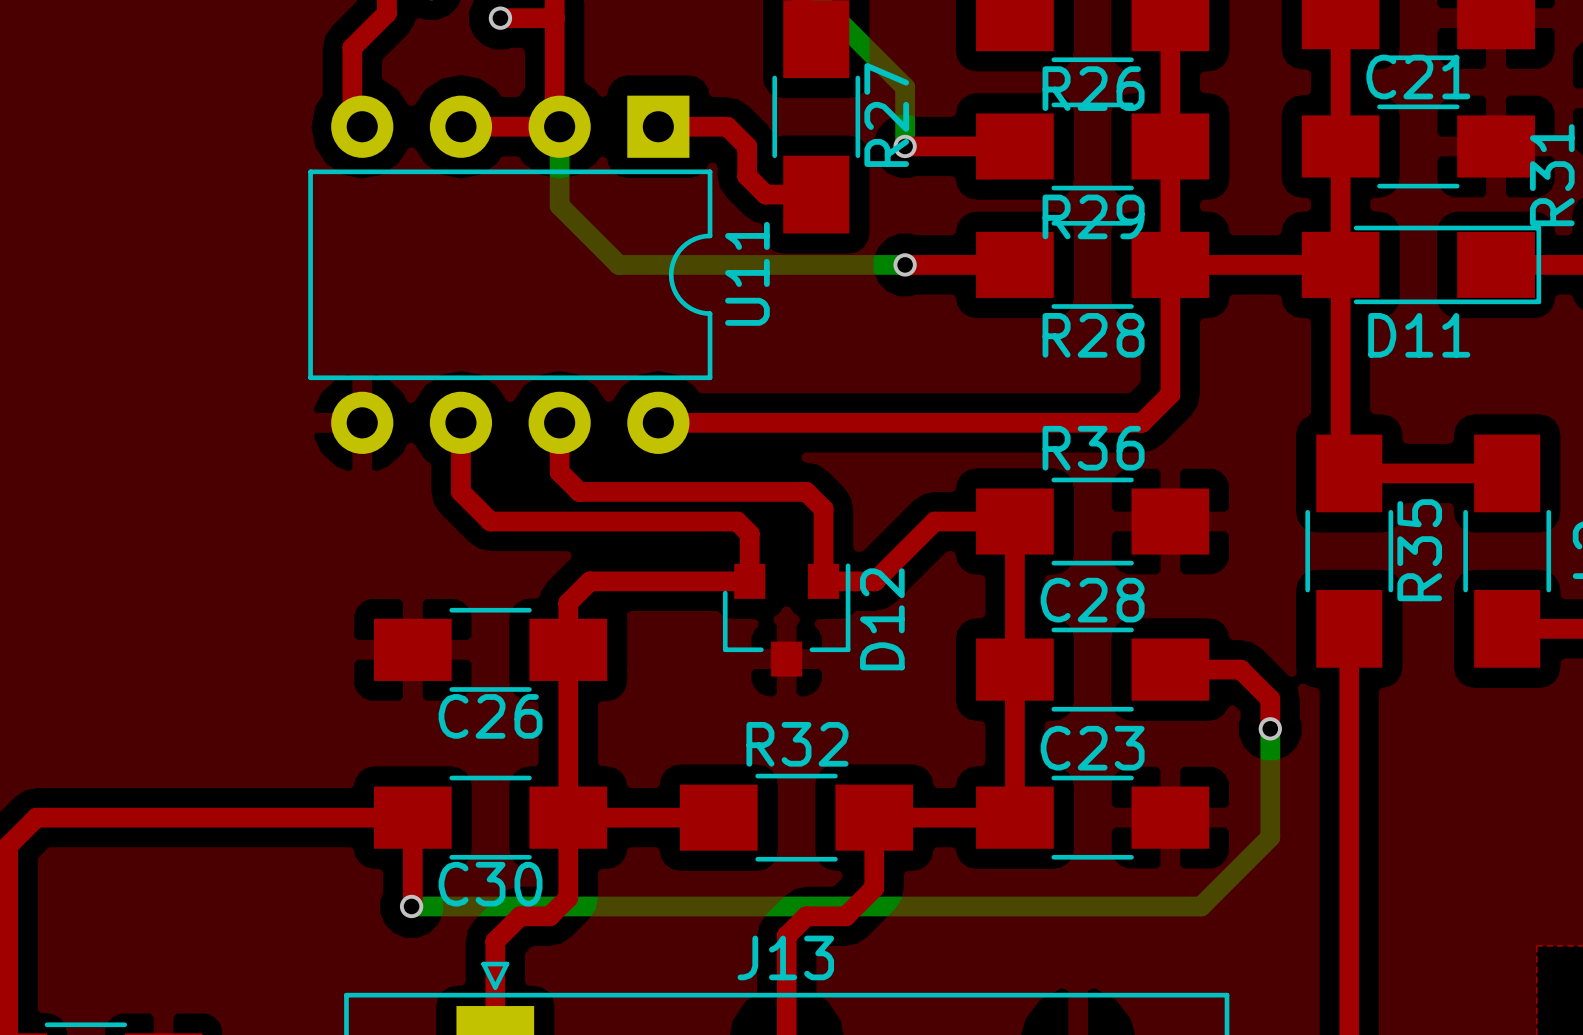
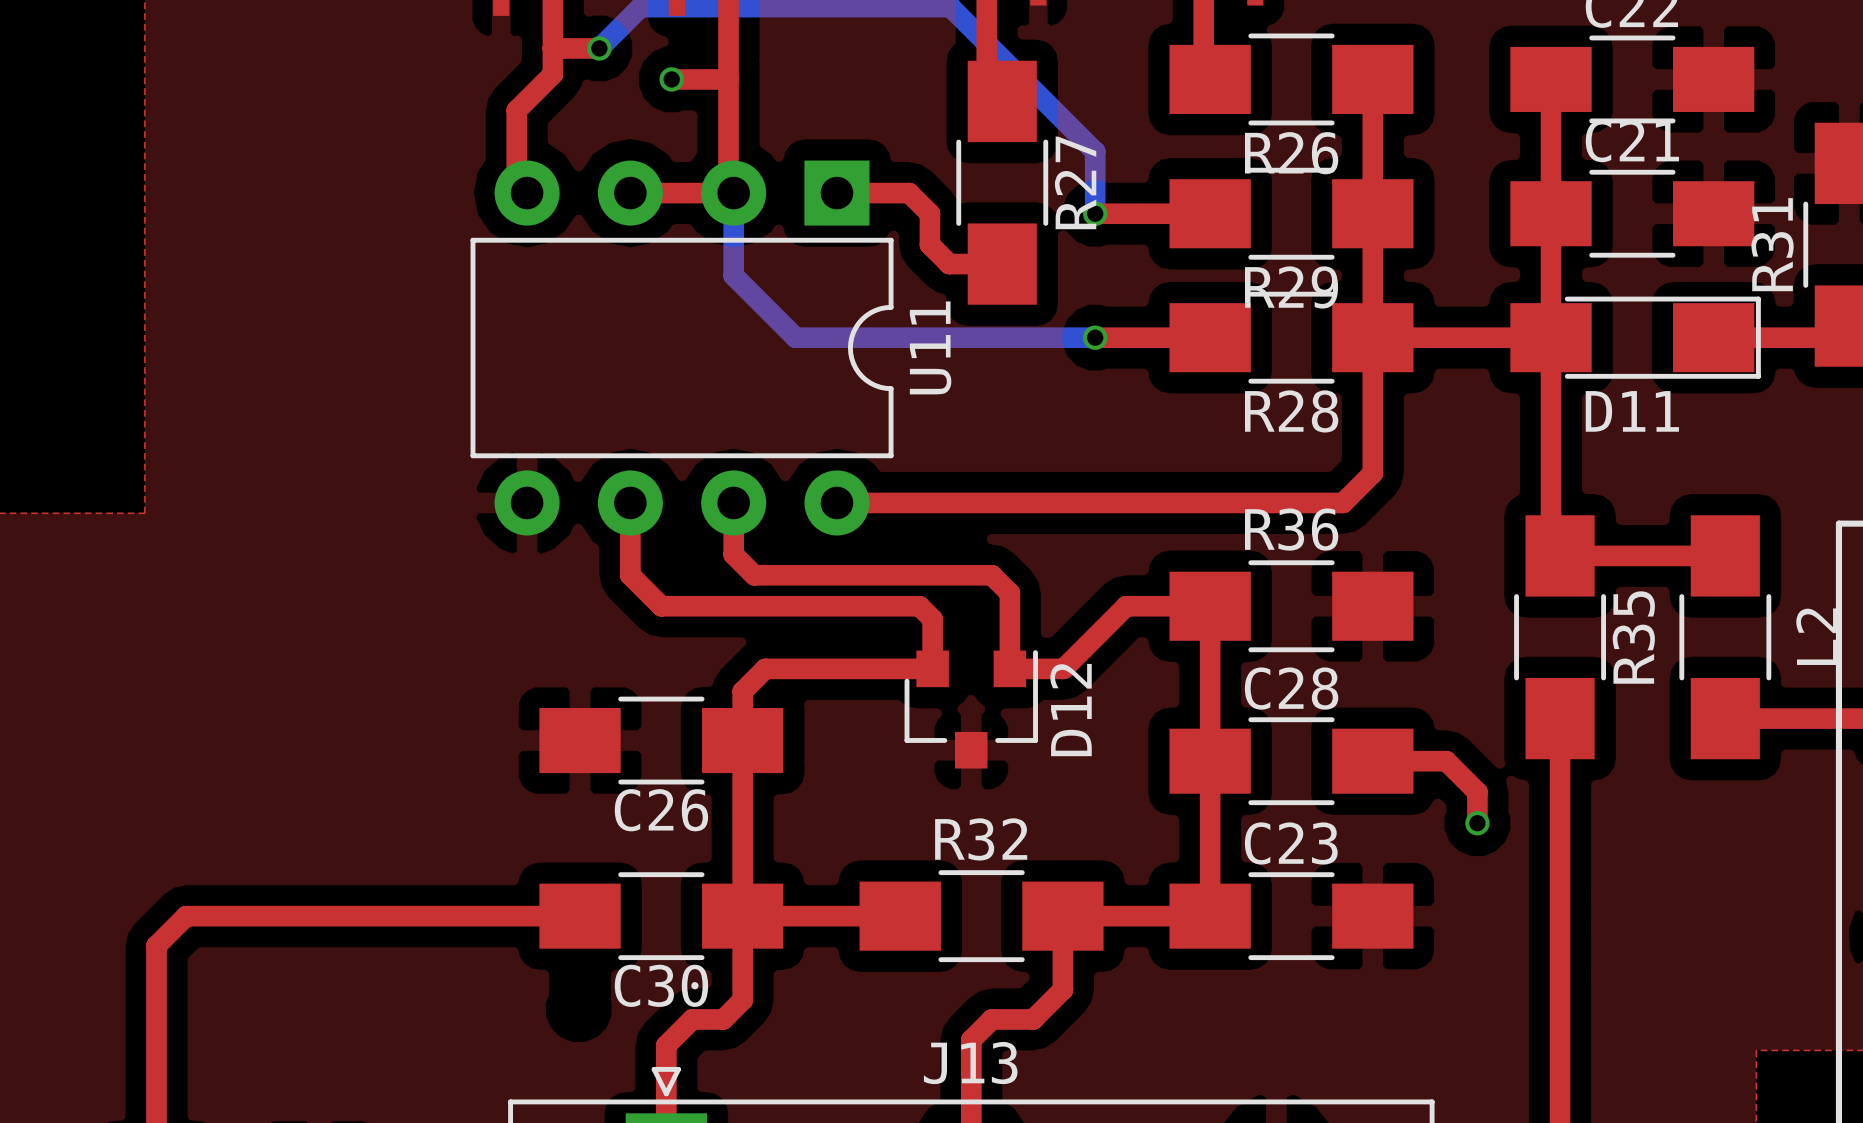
bottom track: (1270, 728) (1270, 837) (1201, 906) (411, 906) -> none
top track: (412, 817) (411, 906) -> none
via: (411, 906) -> none

